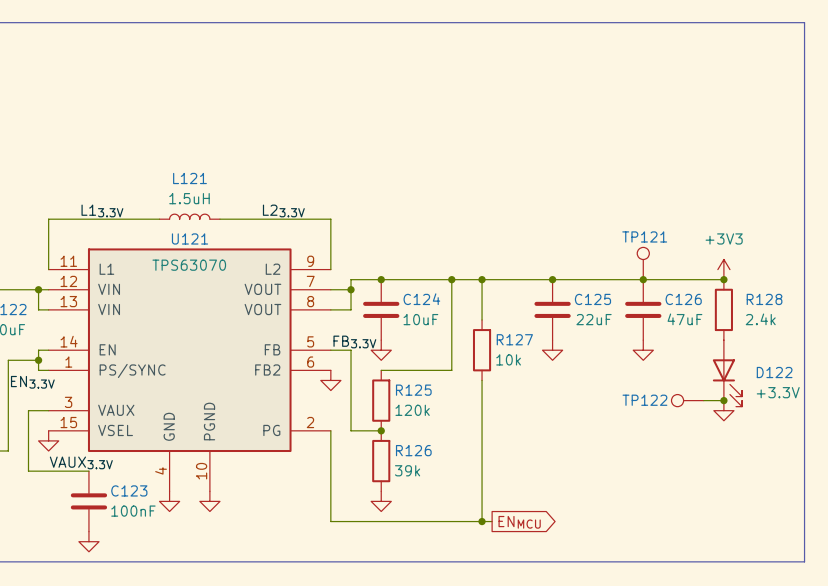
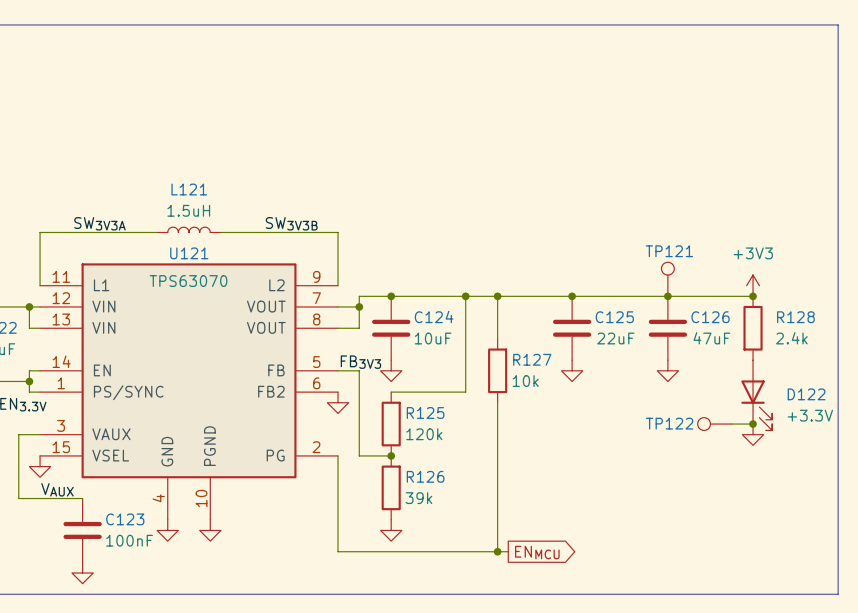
label: L13.3V (102, 210) -> SW3V3A (99, 223)
label: L23.3V (283, 210) -> SW3V3B (291, 223)
label: FB3.3V (354, 341) -> FB3V3 (360, 362)
label: VAUX3.3V (81, 462) -> VAUX (57, 489)

